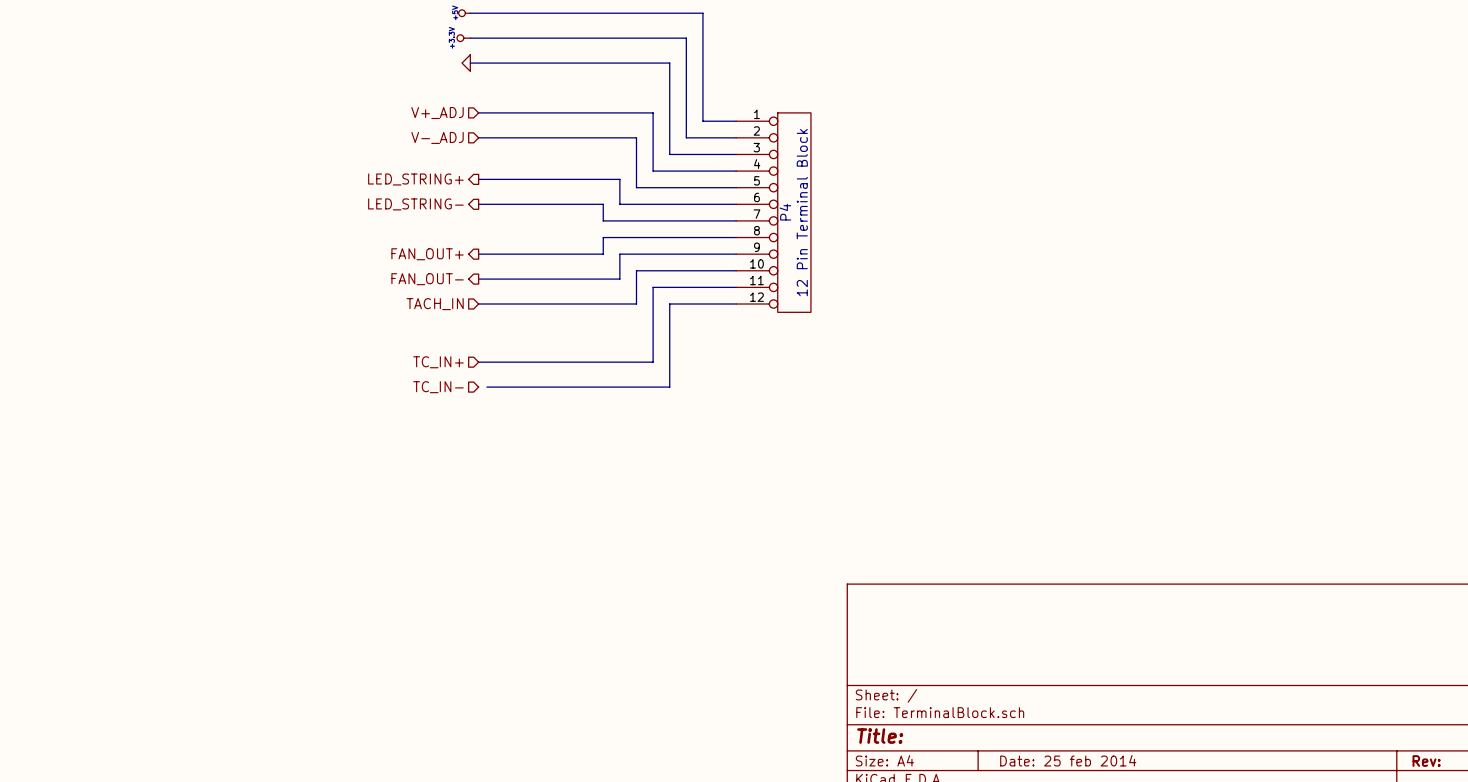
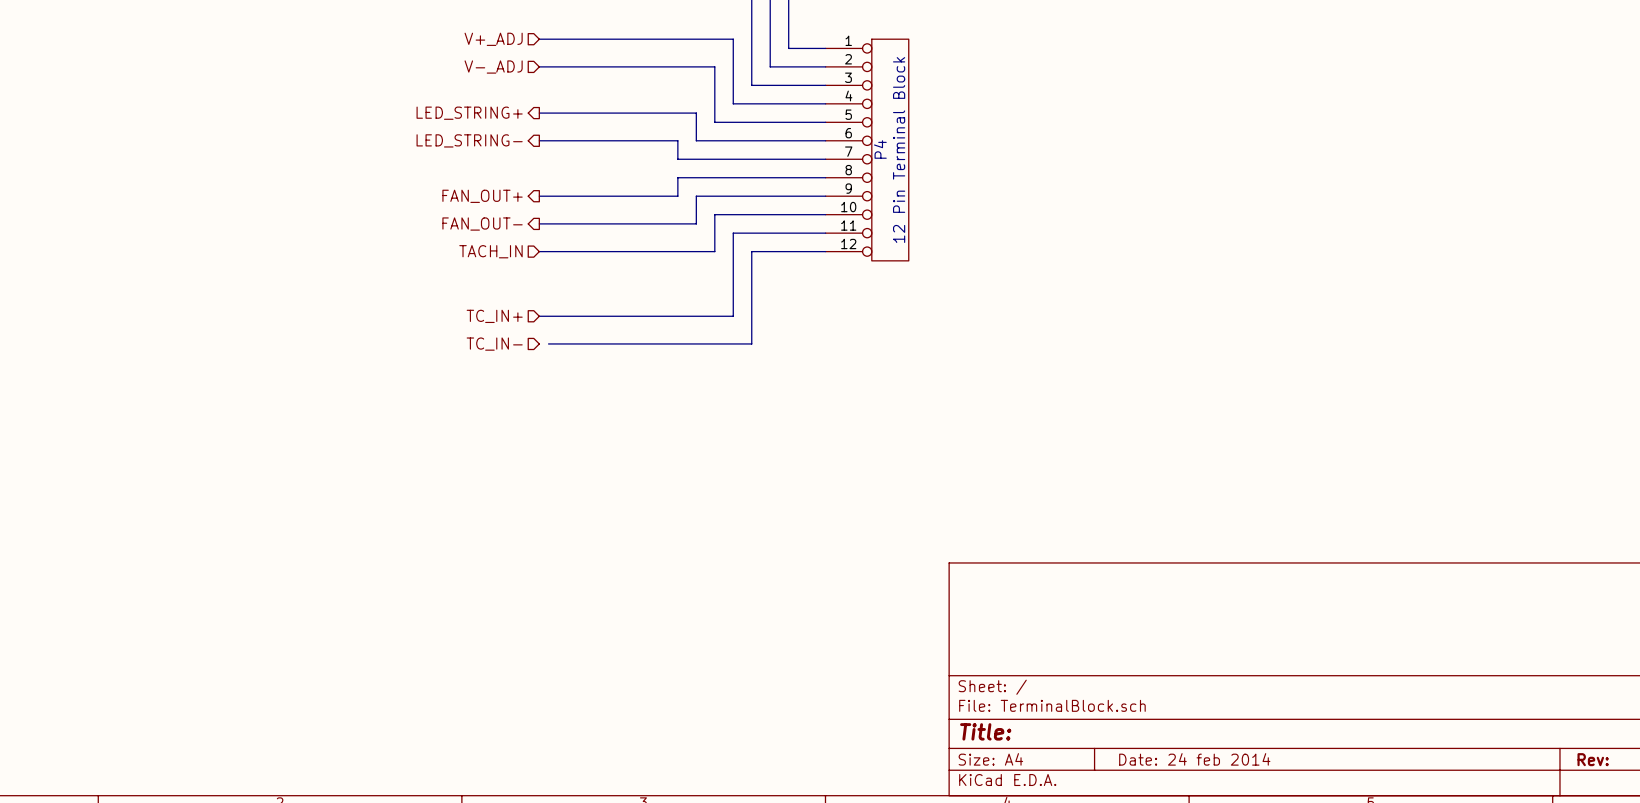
title block: Date: 25 feb 2014 (1068, 760) -> Date: 24 feb 2014 (1194, 759)

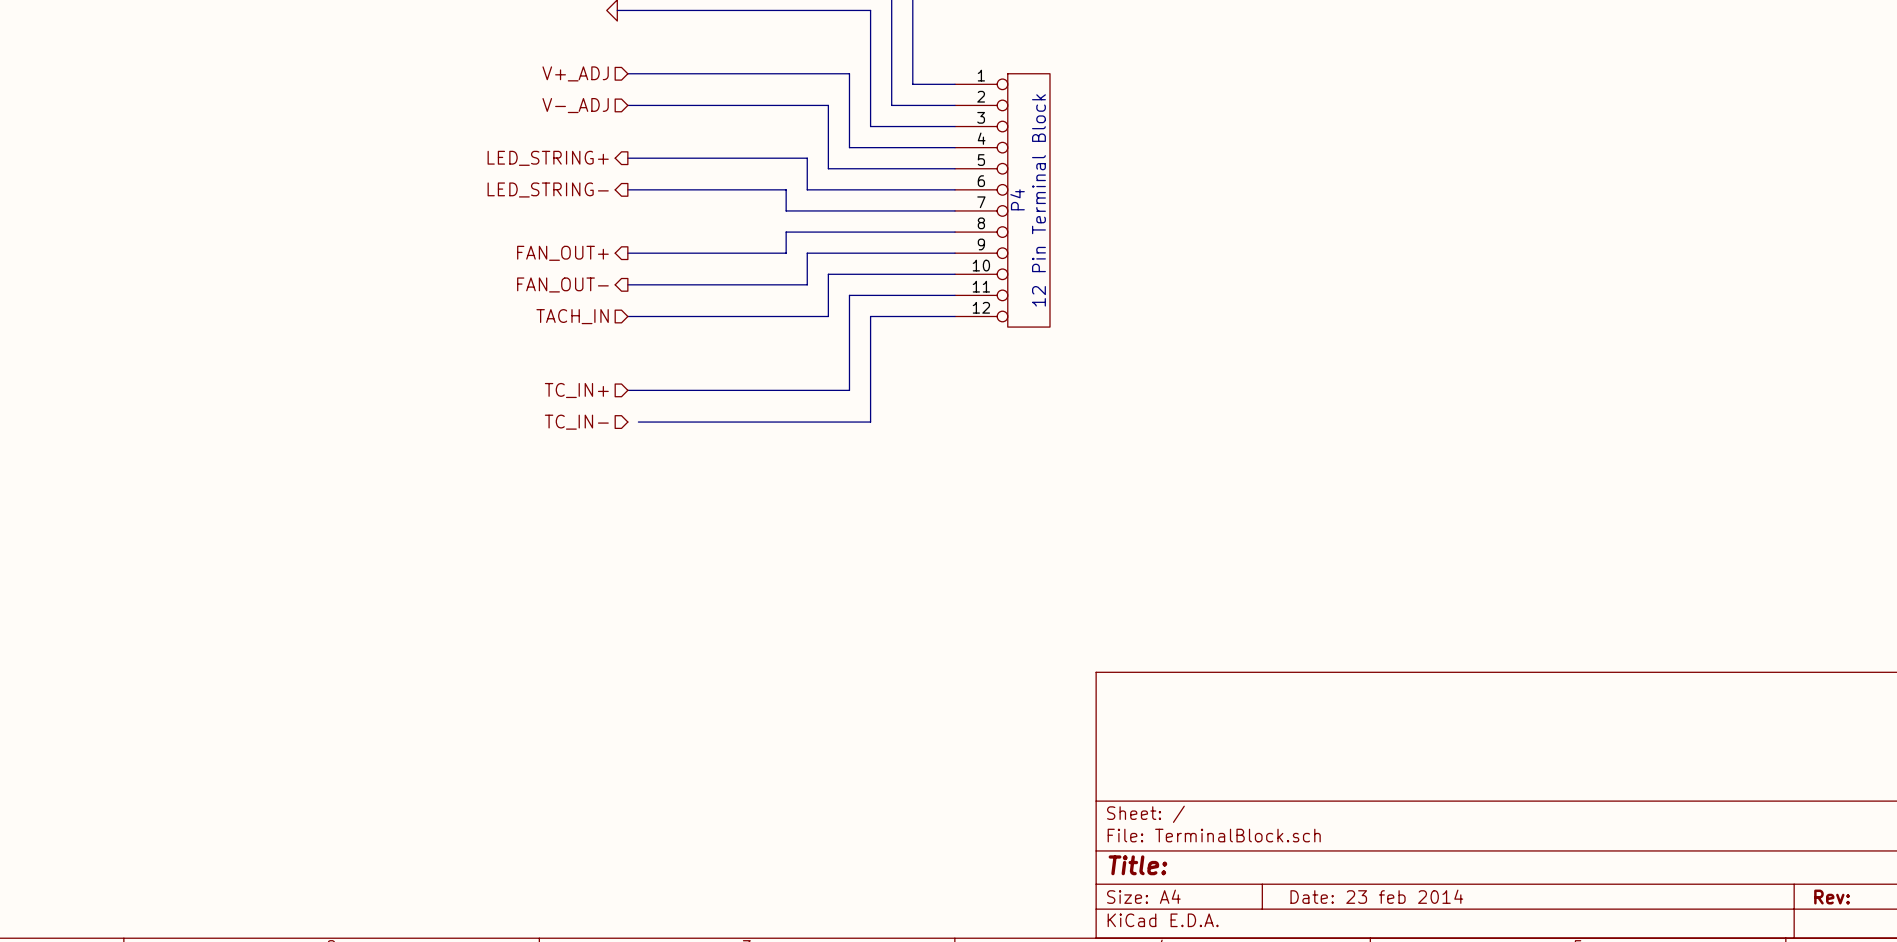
title block: Date: 24 feb 2014 (1194, 759) -> Date: 23 feb 2014 (1376, 896)

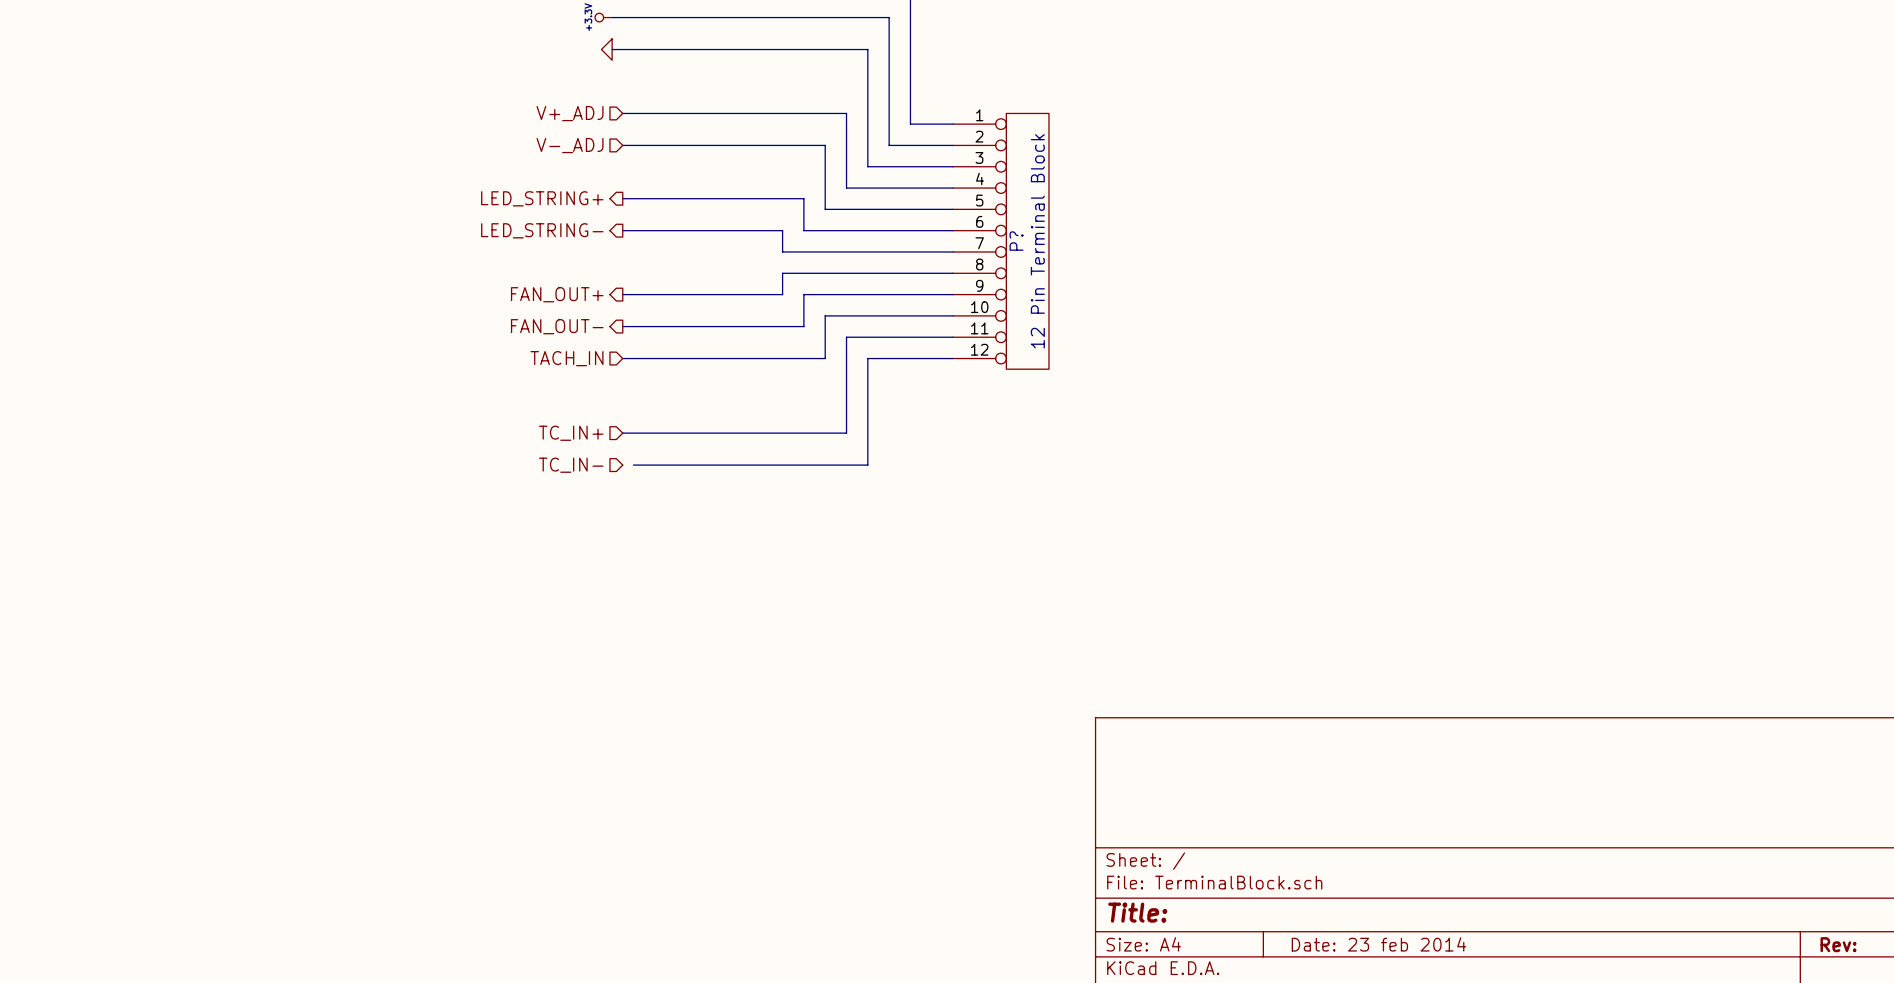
P4 name: P4 (1017, 199) -> P? (1016, 241)

